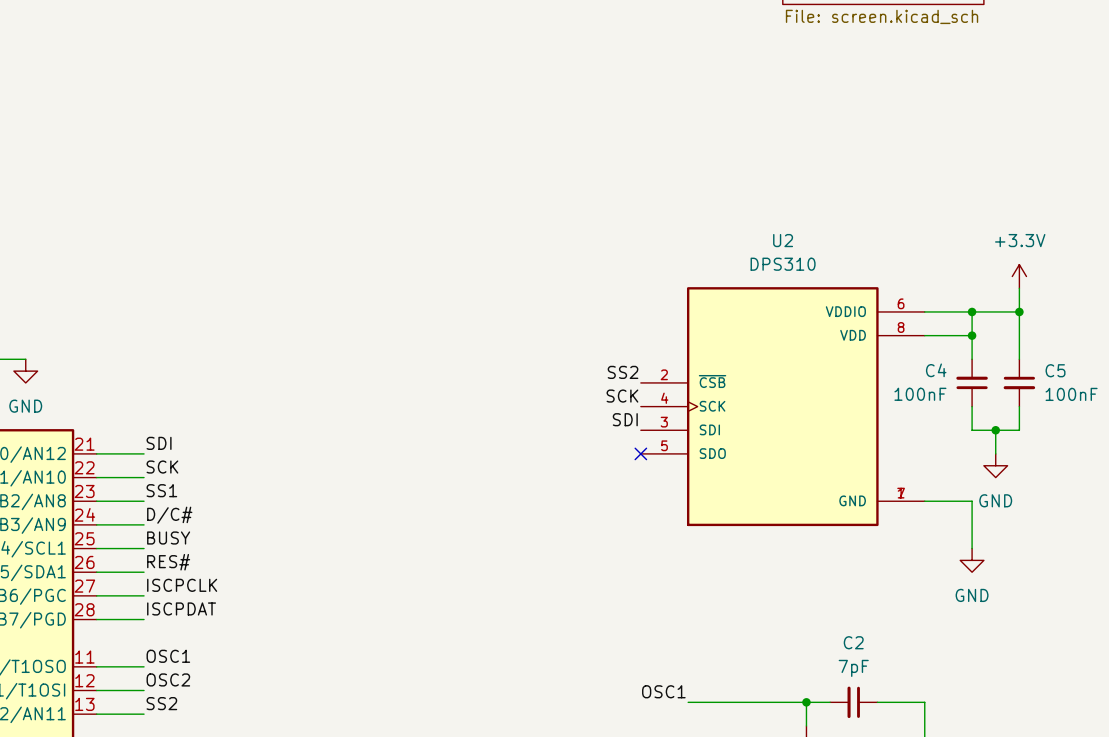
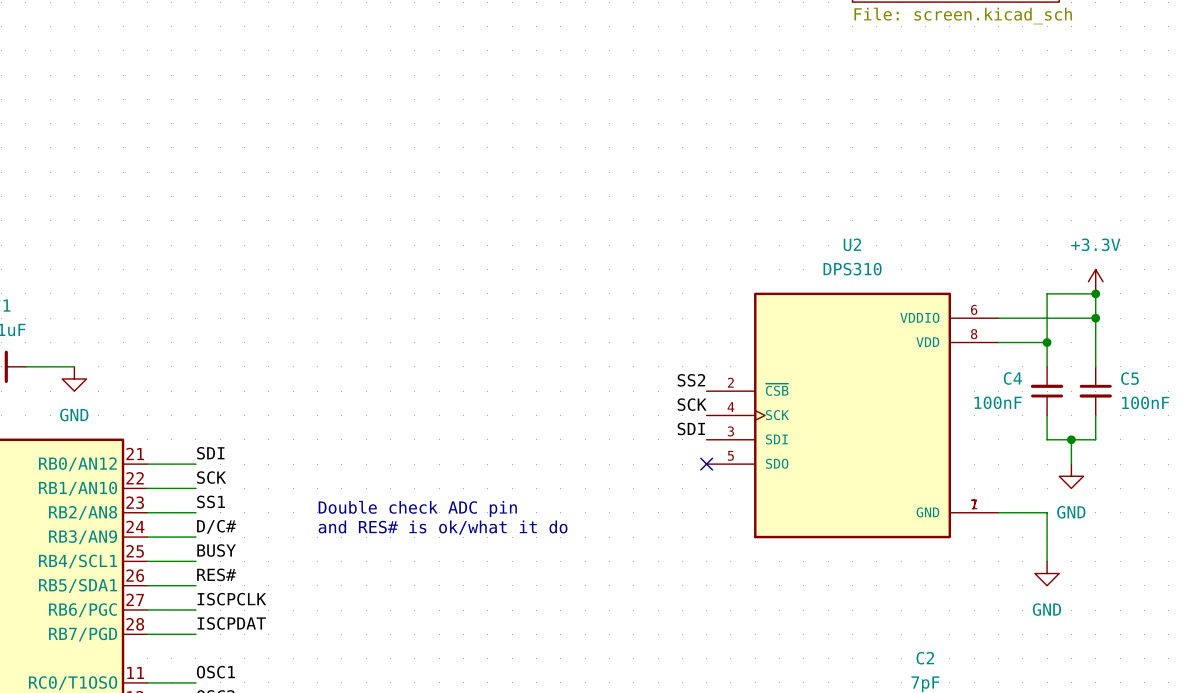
wire: none -> (1095, 293) (1047, 293) (1047, 318)
junction position: (972, 311) -> (1095, 293)
text: none -> Double check ADC pin (417, 508)
text: none -> and RES# is ok/what it do (443, 527)

